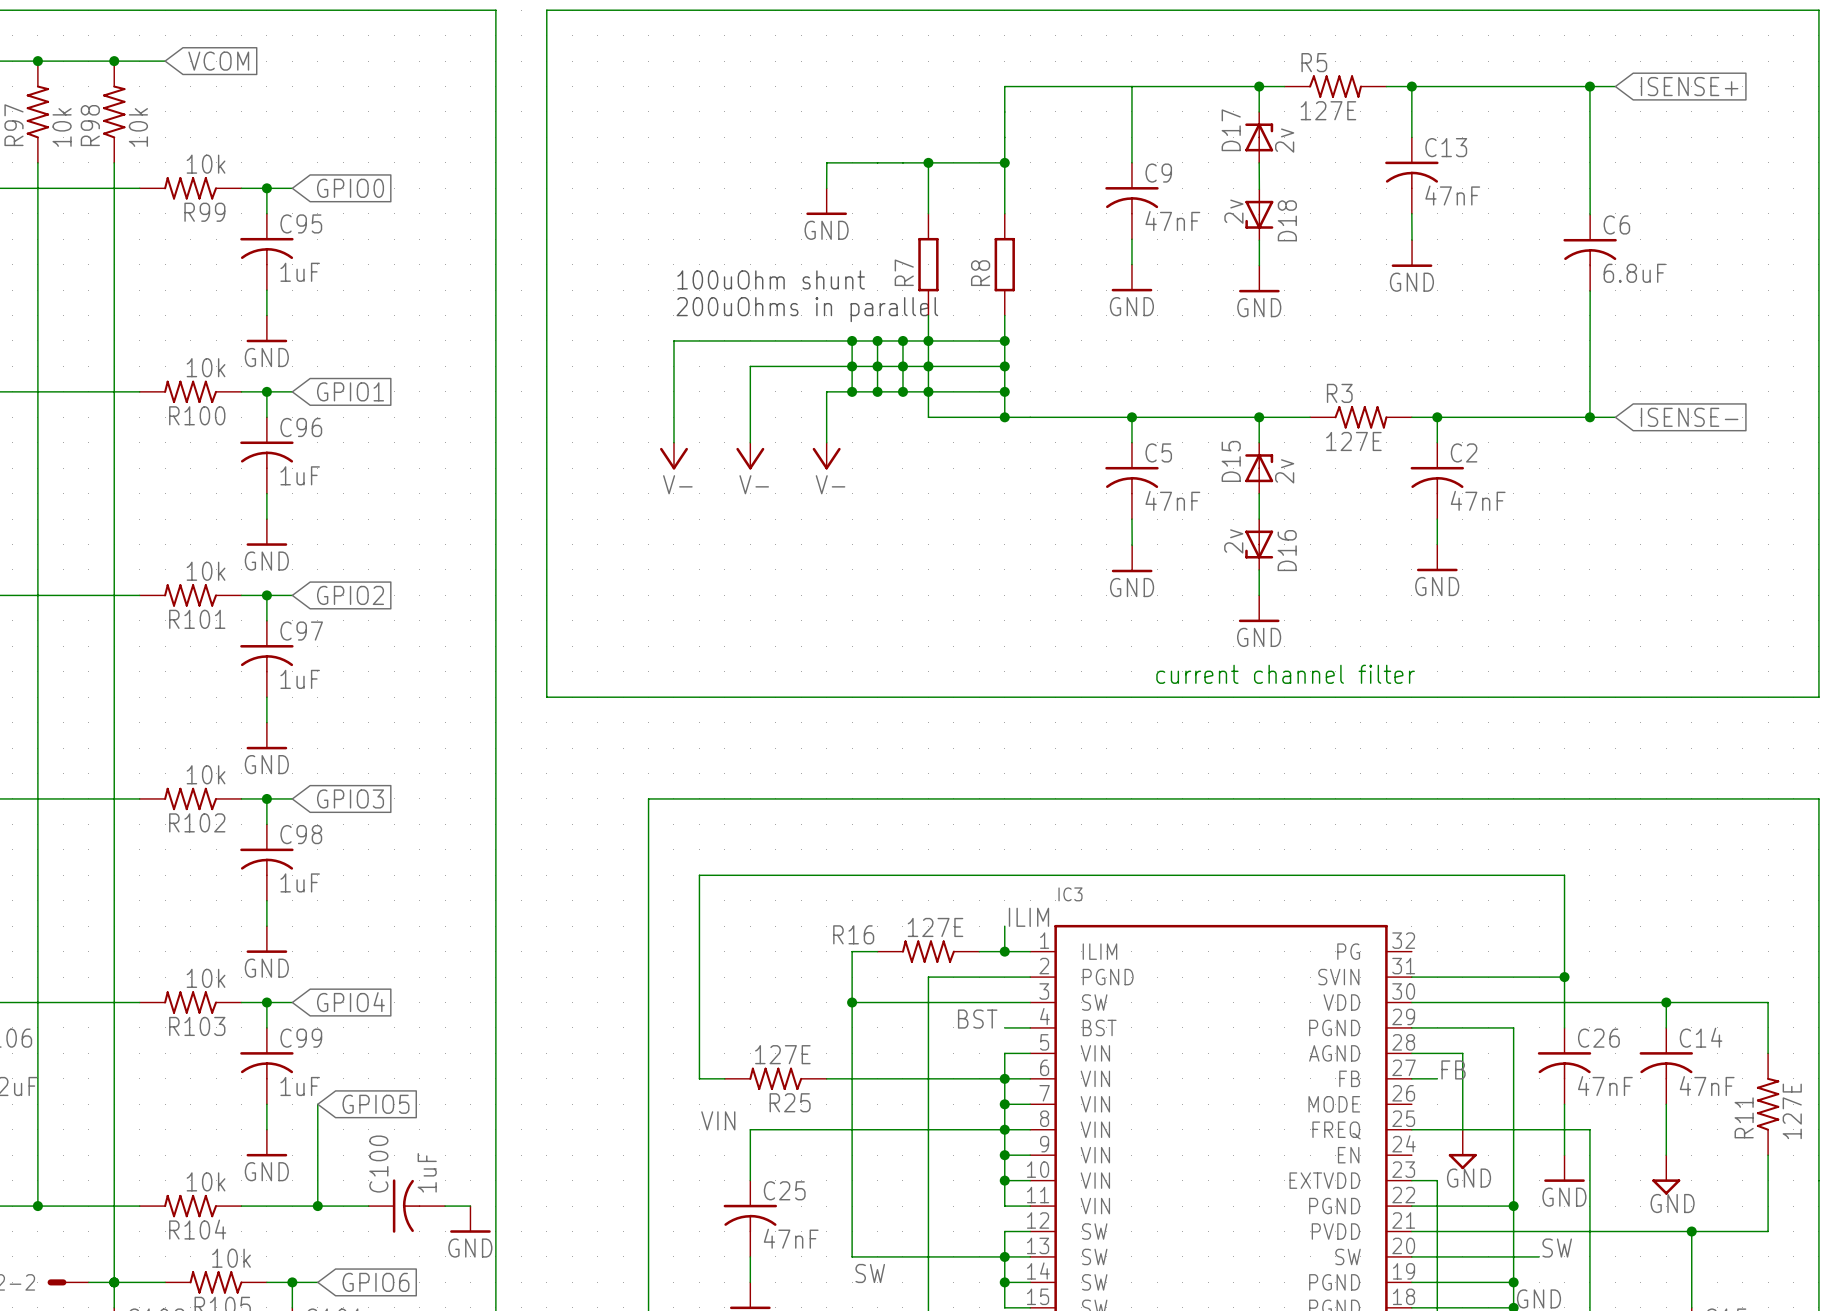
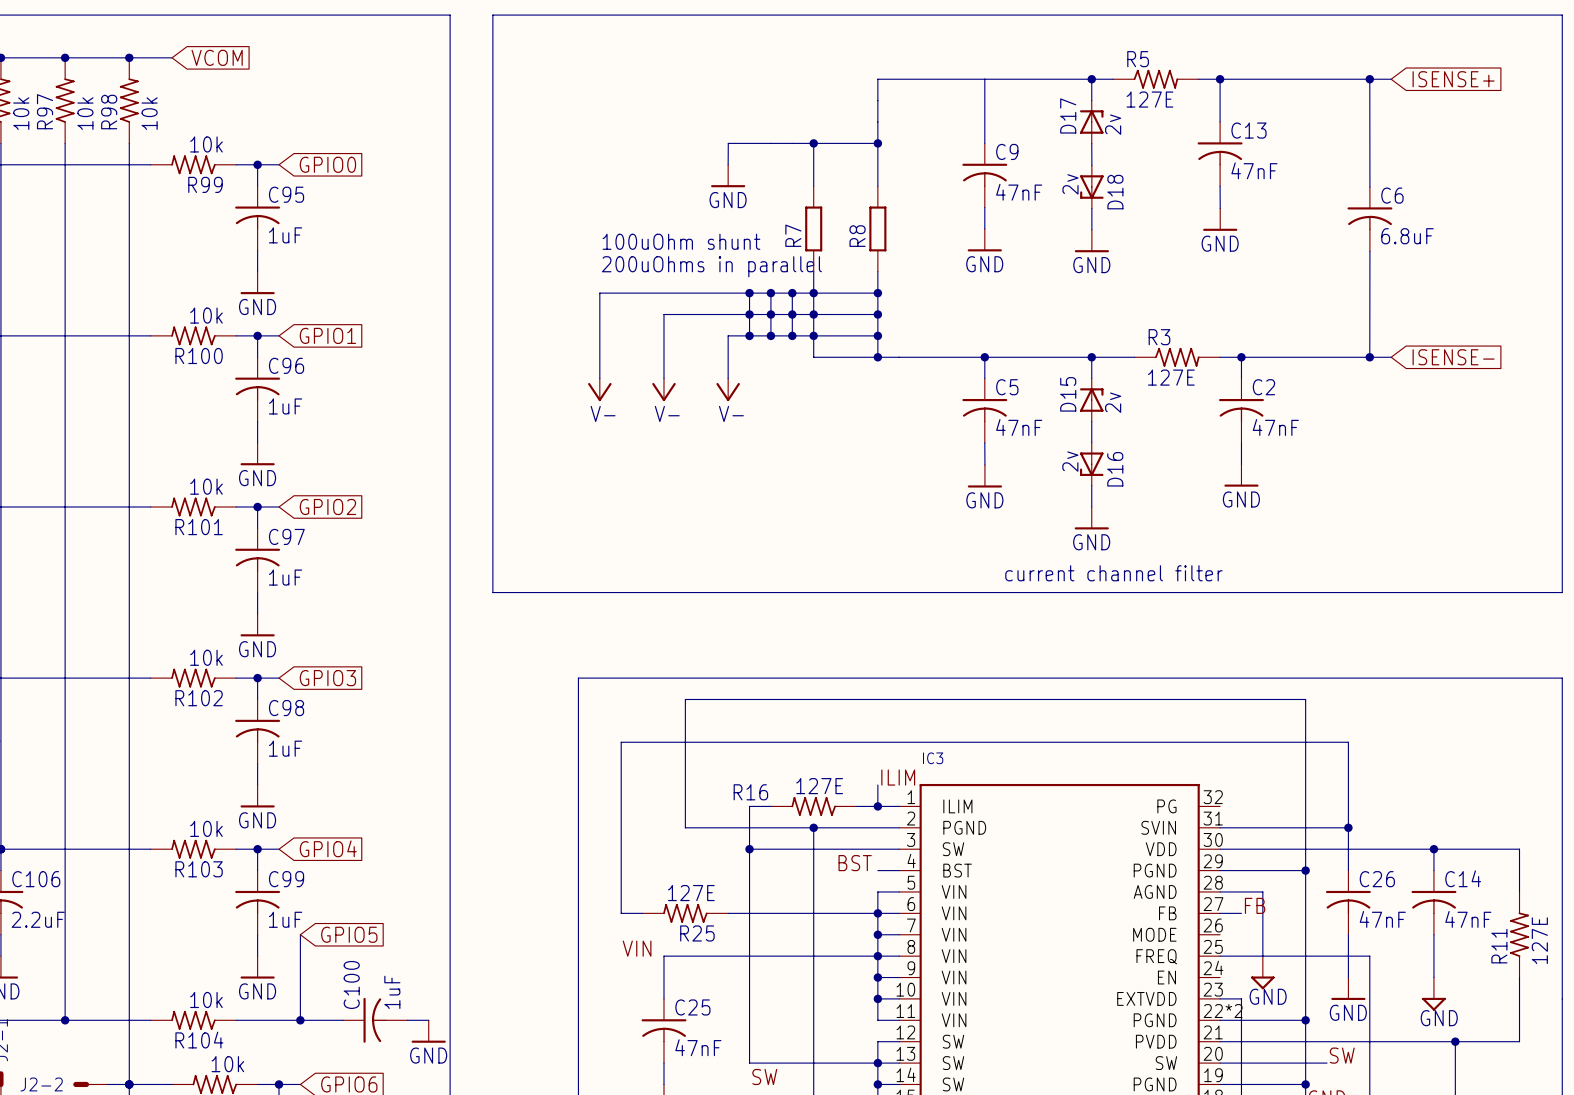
wire: none -> (813, 827) (685, 827) (685, 699) (1305, 699) (1305, 870)
junction: none -> (813, 827)
junction: none -> (1305, 870)
IC3 pin number: 22 (1403, 1195) -> 22*2 (1223, 1011)

